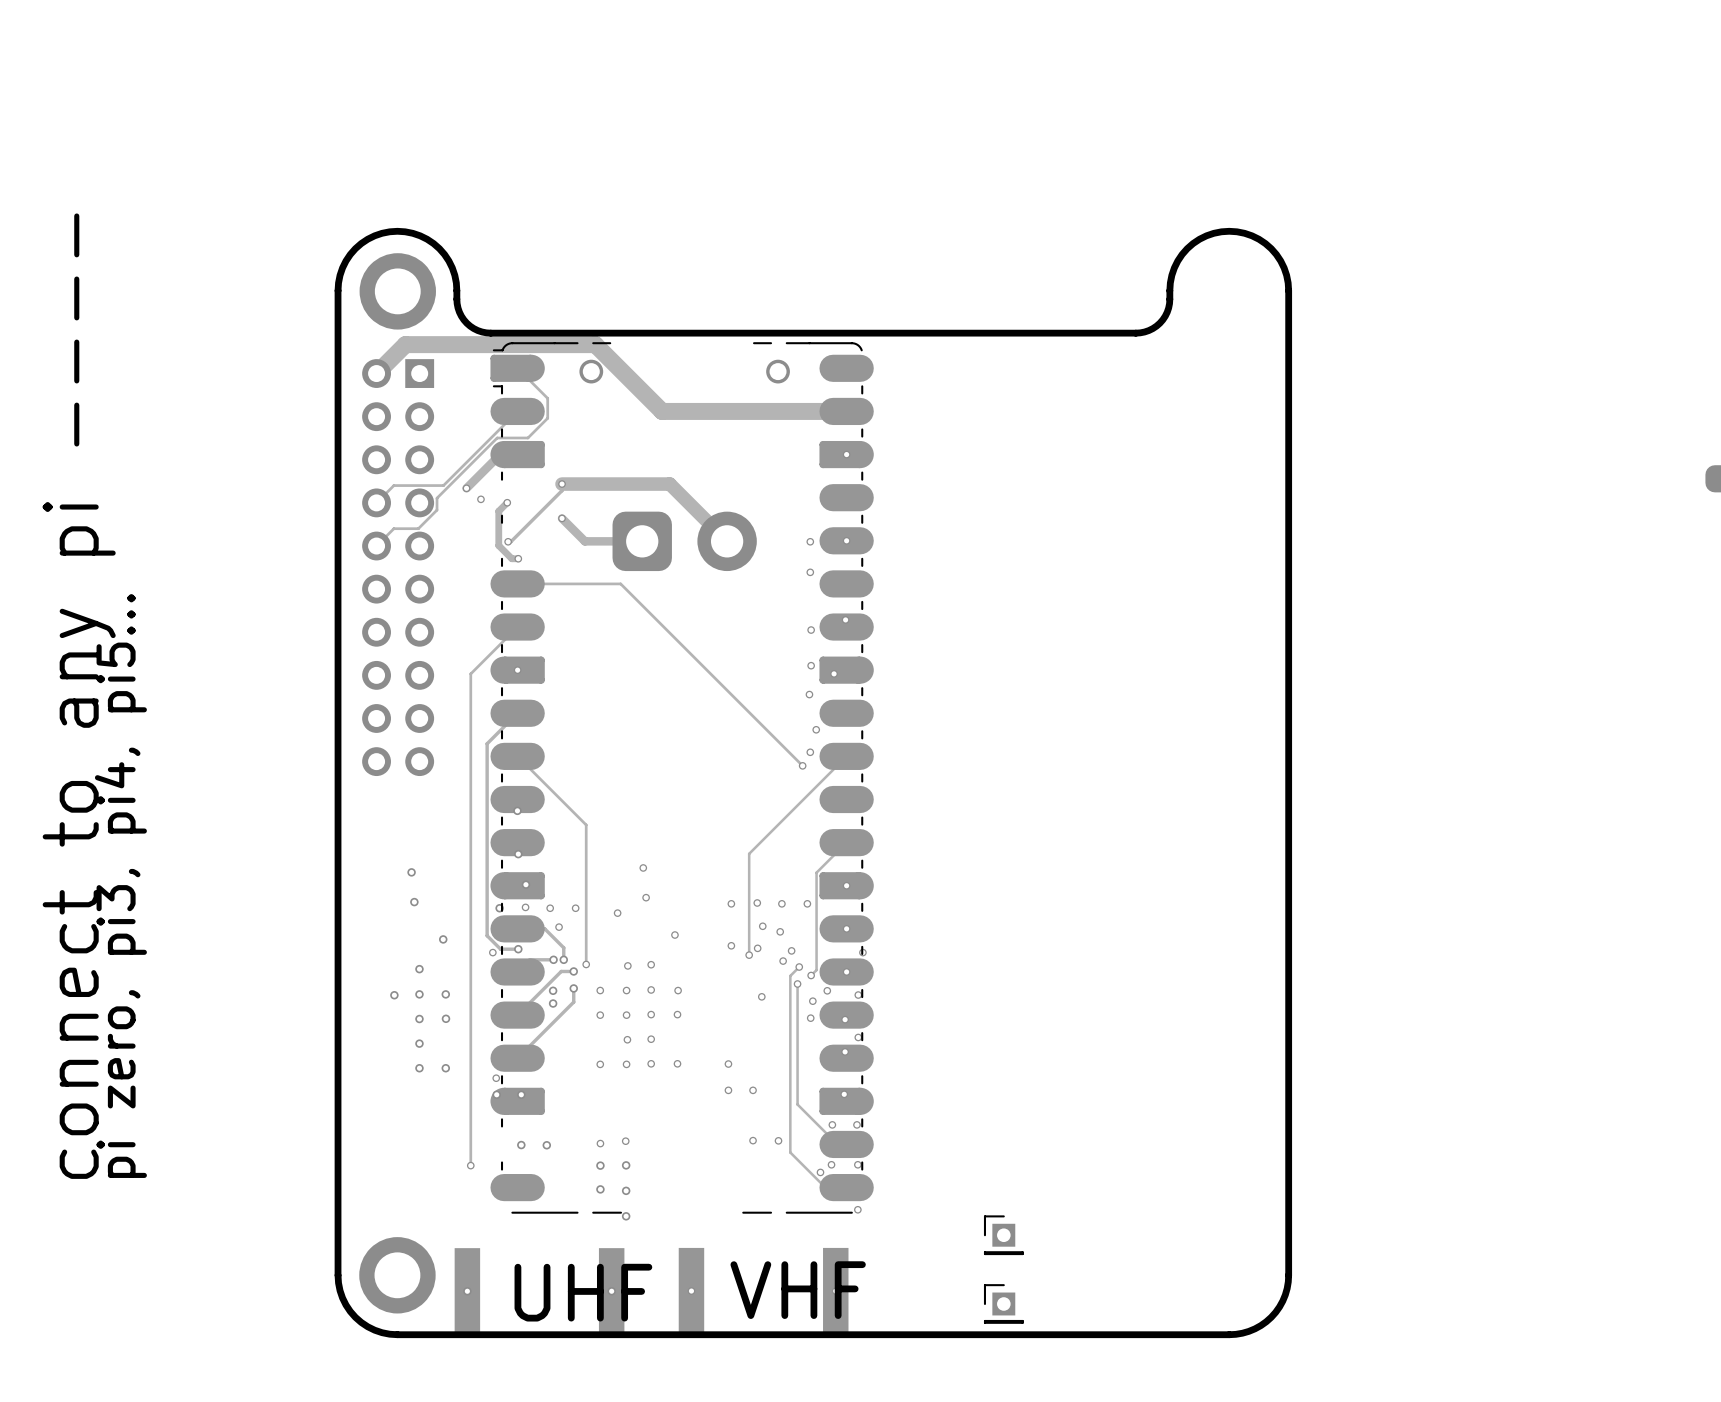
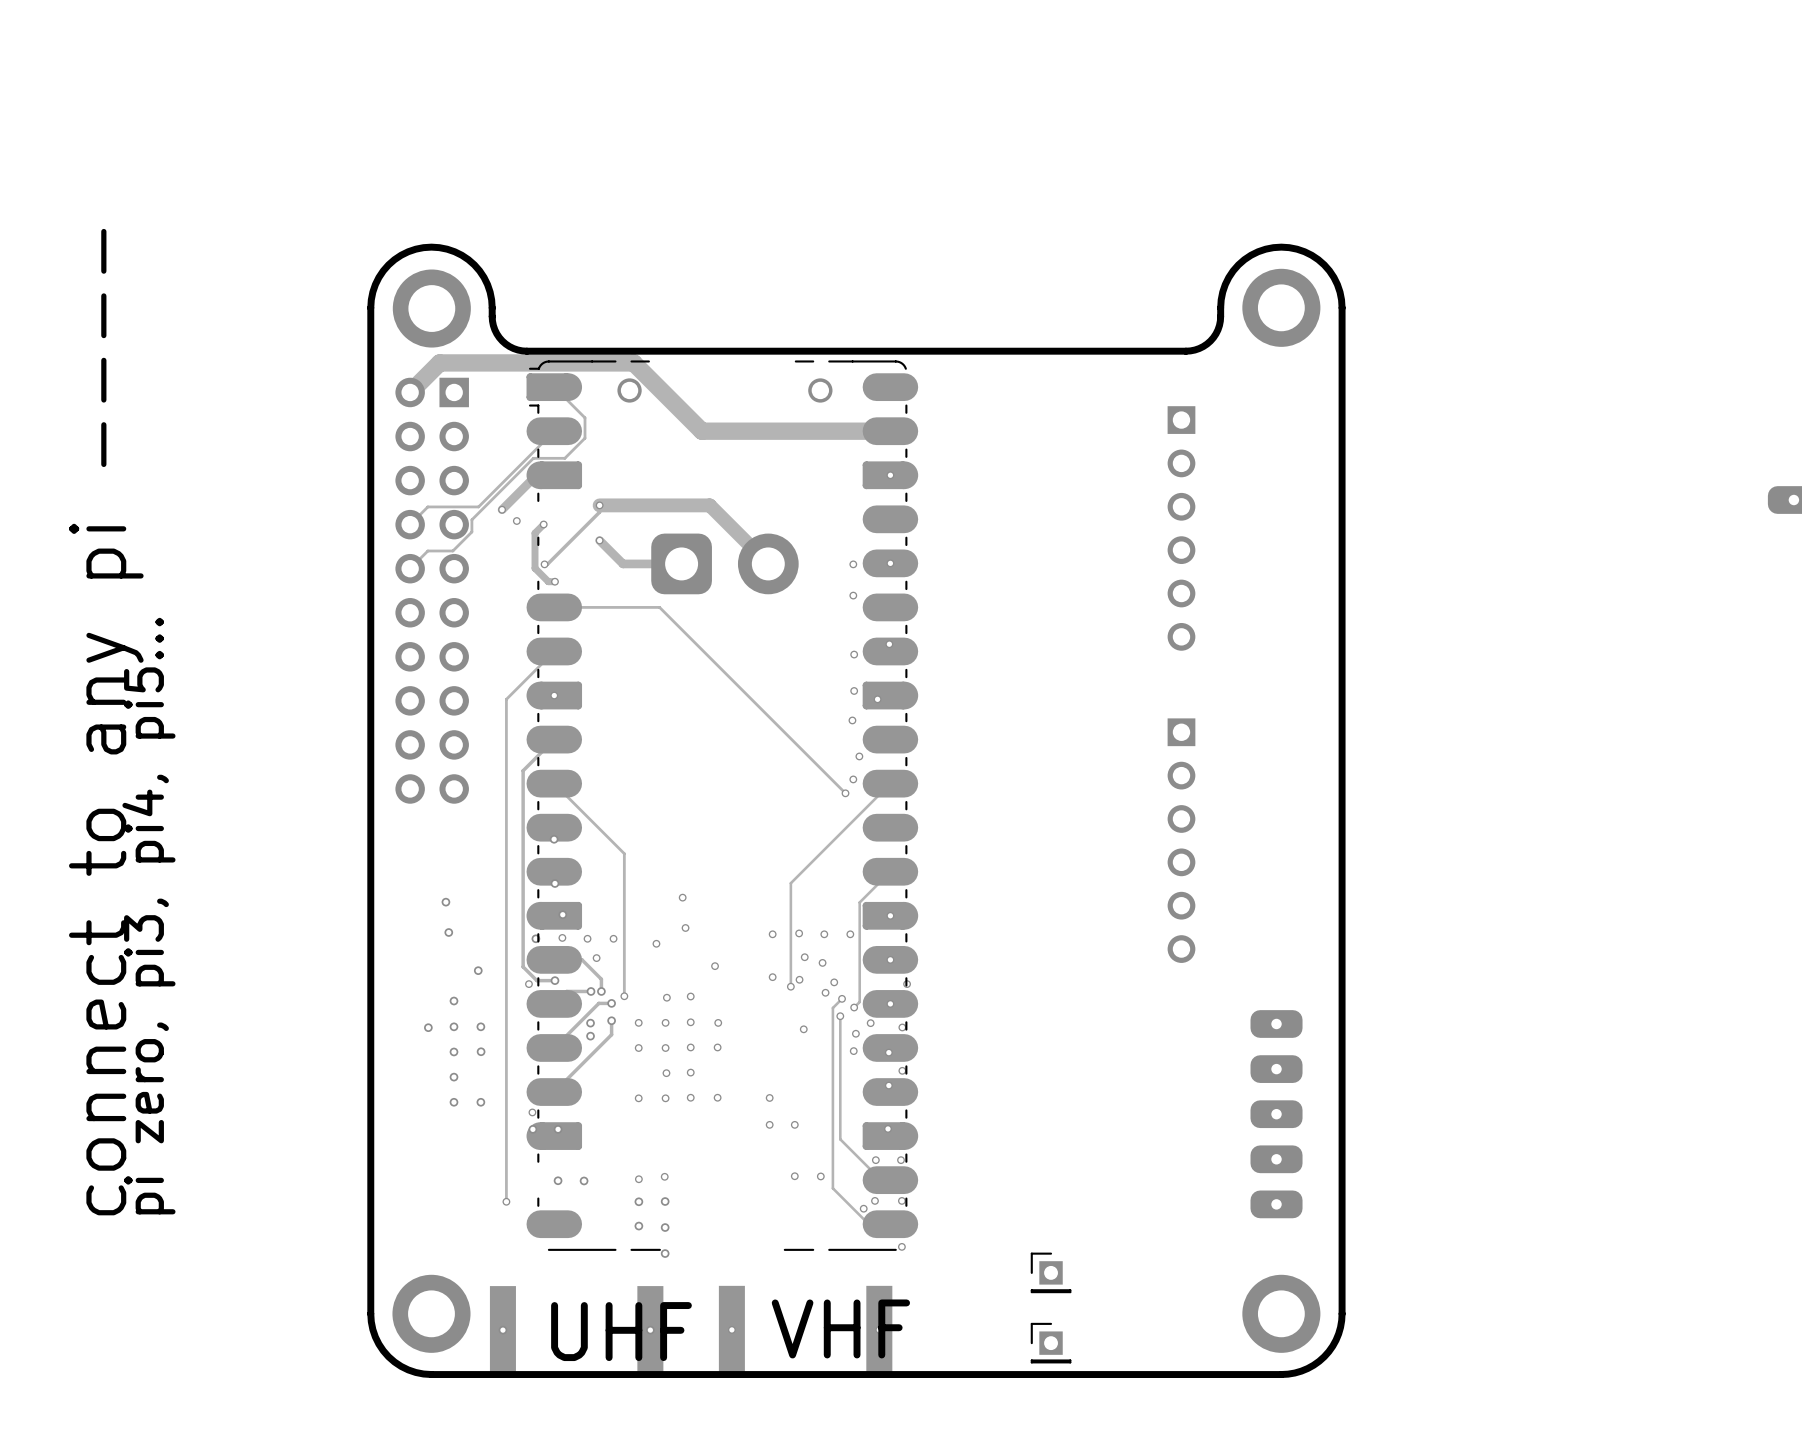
part: none -> (1281, 307)
part: none -> (1181, 528)
part: none -> (1181, 840)
part: none -> (1276, 1023)
part: none -> (1276, 1069)
part: none -> (1276, 1114)
part: none -> (1276, 1159)
part: none -> (1276, 1204)
part: none -> (1281, 1313)

